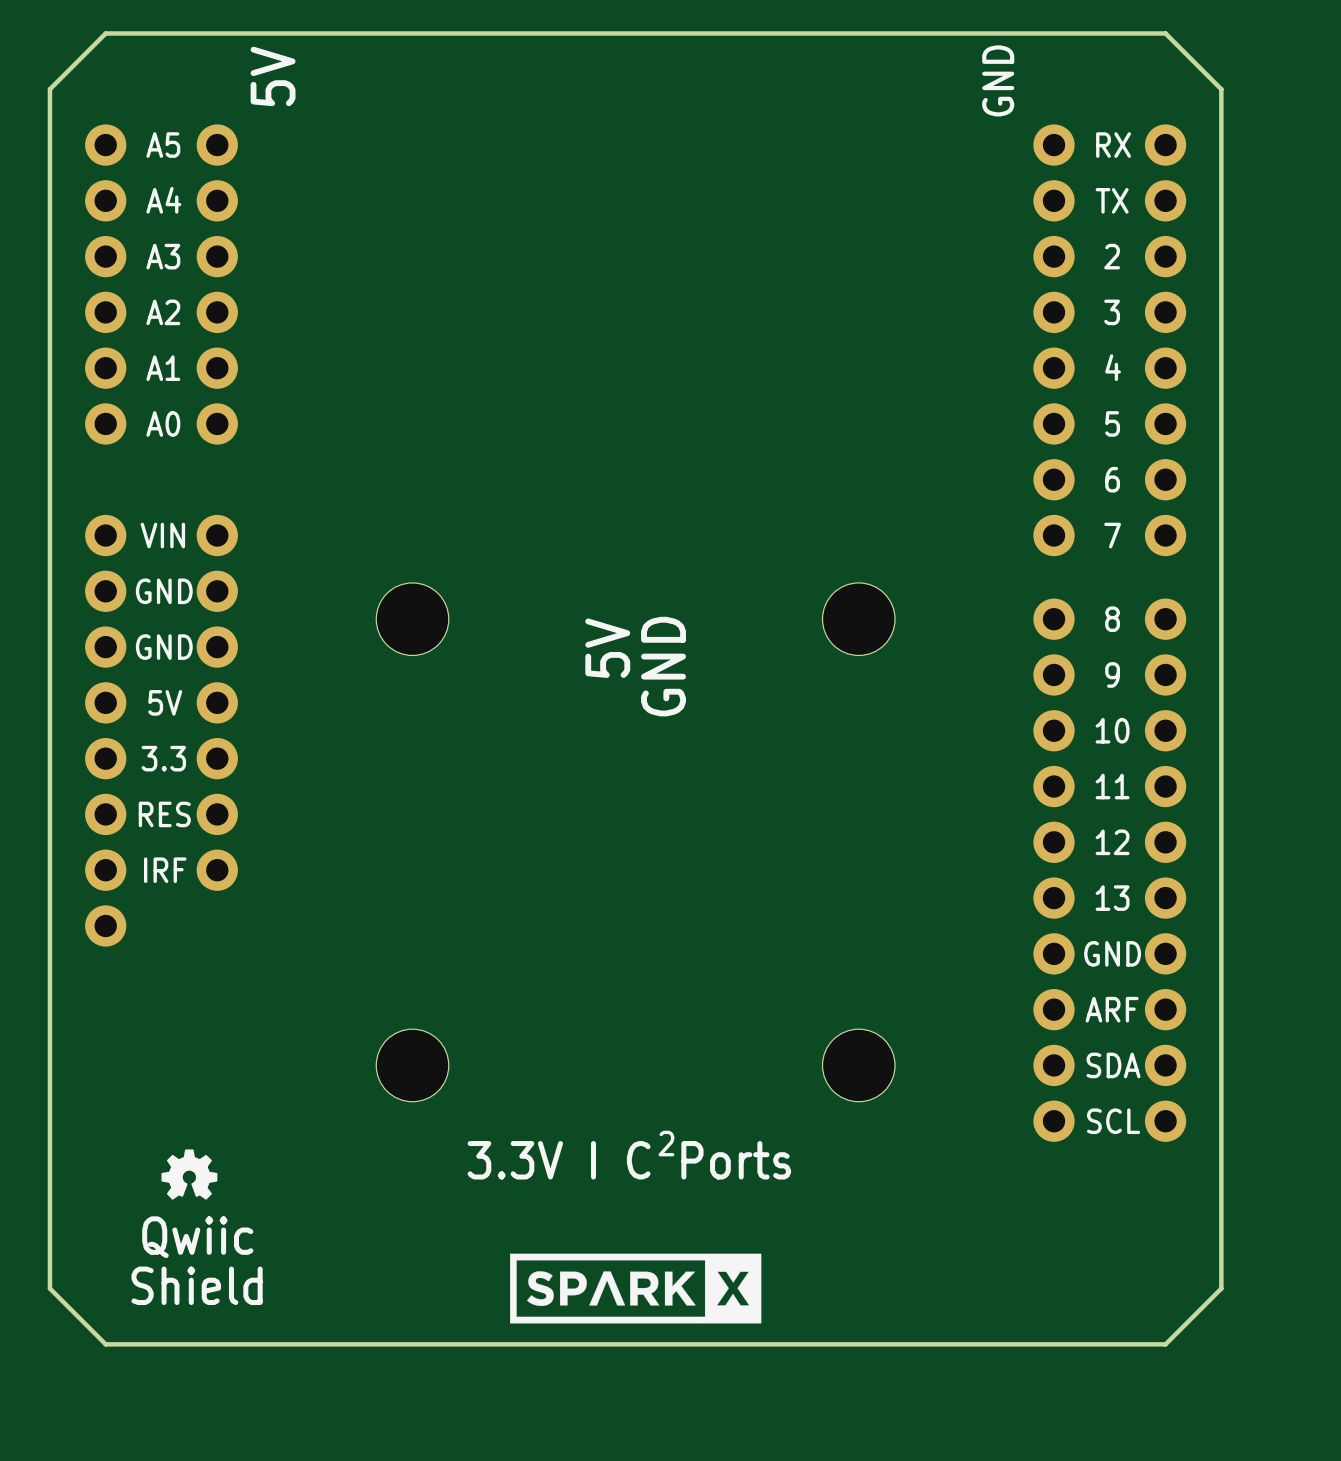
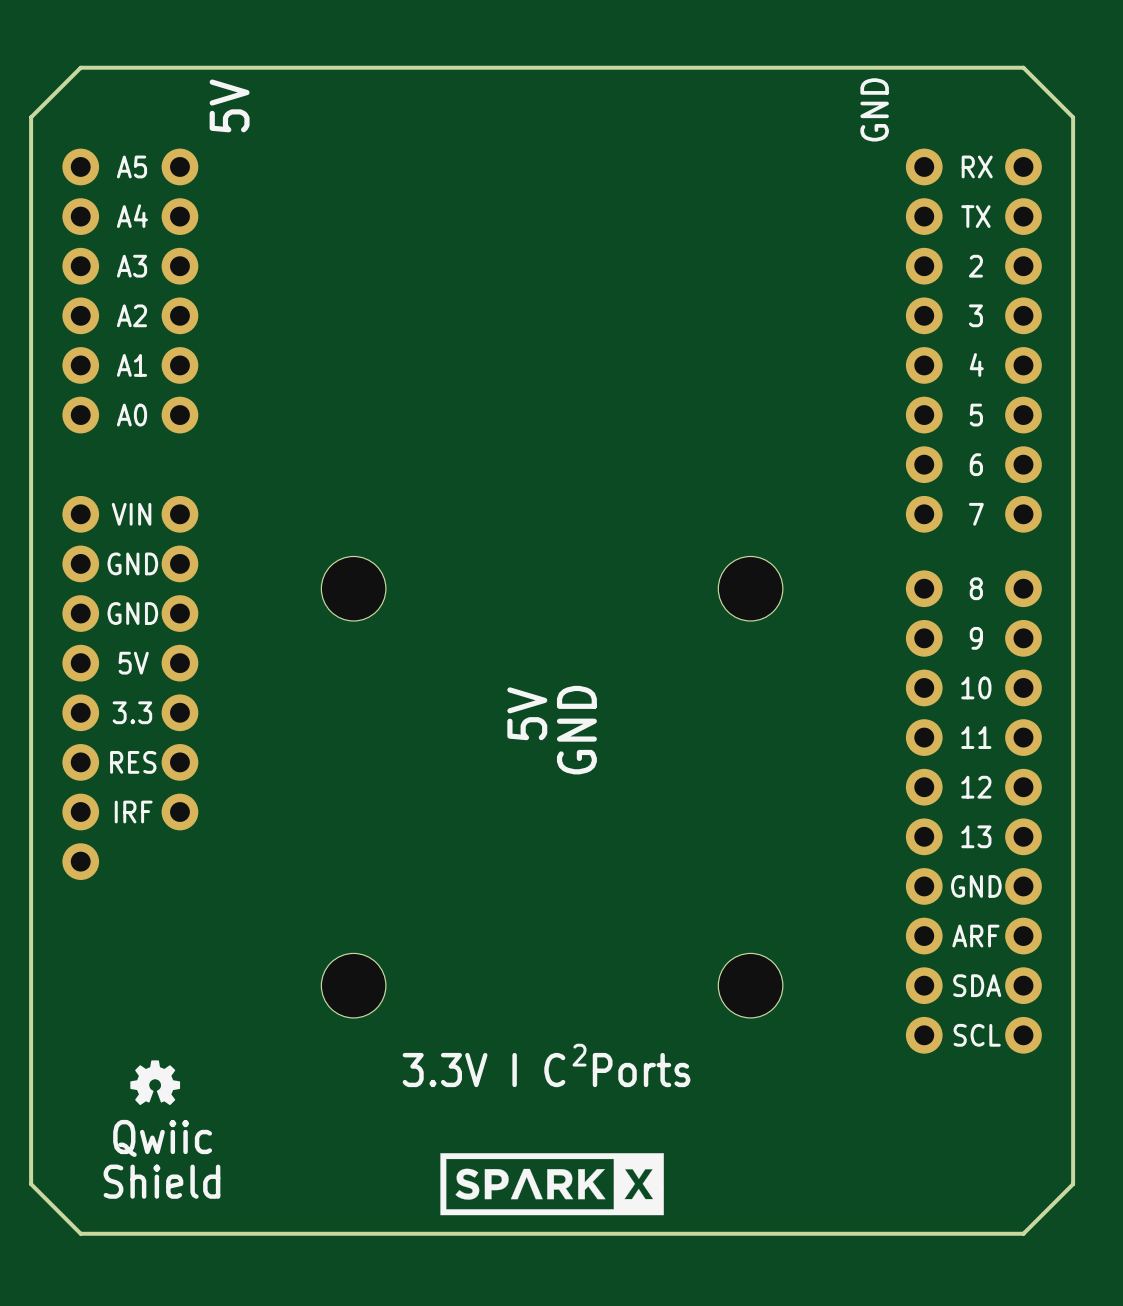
text position: 5V (607, 648) -> 5V (527, 713)
text position: GND (663, 666) -> GND (576, 730)

